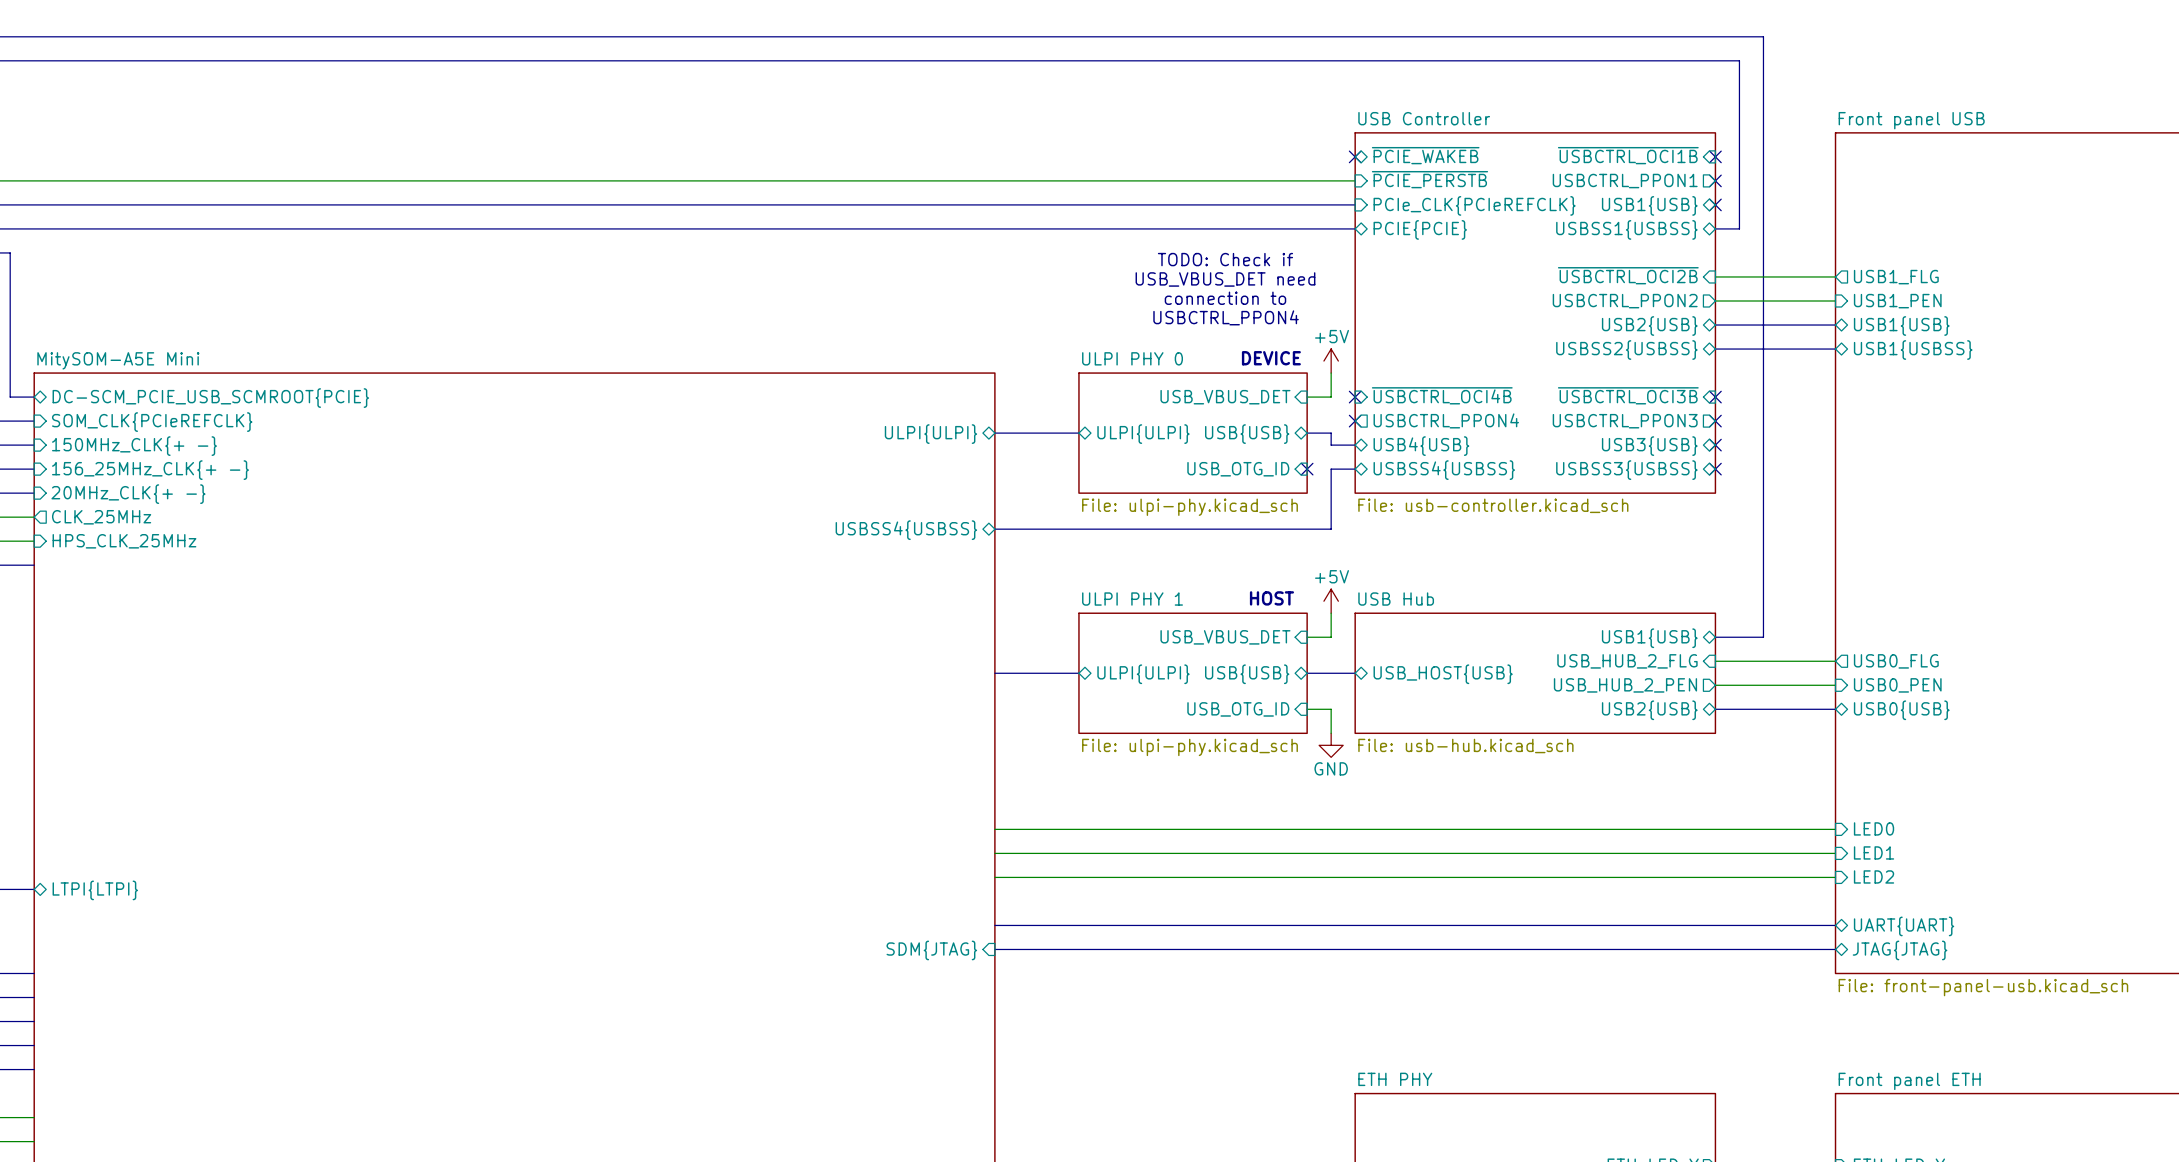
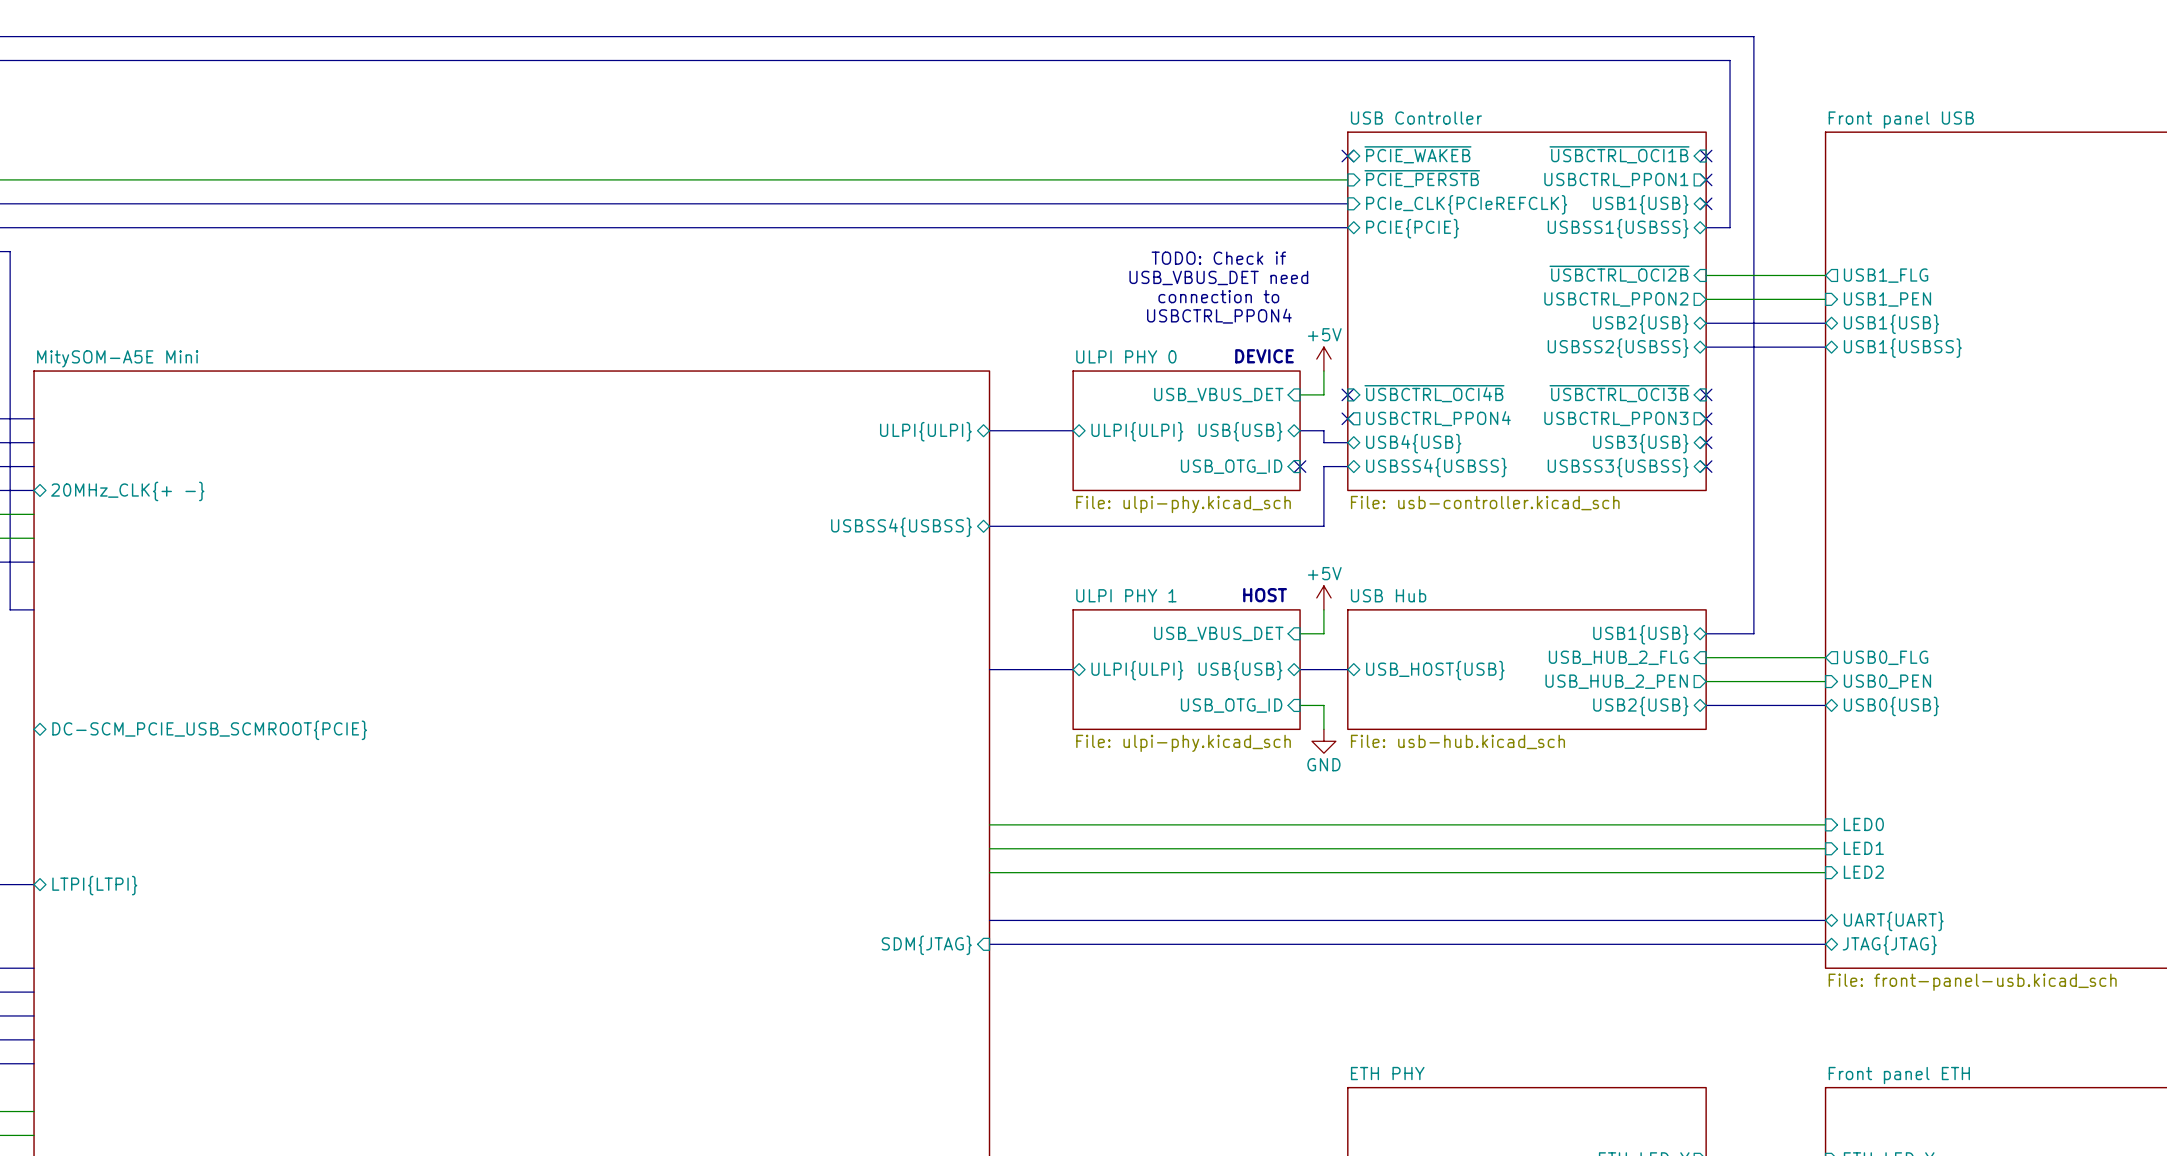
bus: (10, 397) (34, 397) -> (10, 394) (10, 609) (34, 609)
sheet pin: DC-SCM_PCIE_USB_SCMROOT{PCIE} (210, 398) -> none
sheet pin: SOM_CLK{PCIeREFCLK} (152, 422) -> none
sheet pin: 150MHz_CLK{+ -} (134, 446) -> none
sheet pin: 156_25MHz_CLK{+ -} (150, 470) -> none
sheet pin shape: input (128, 494) -> bidirectional (127, 491)
sheet pin: CLK_25MHz (101, 517) -> none
sheet pin: HPS_CLK_25MHz (124, 541) -> none
sheet pin: none -> DC-SCM_PCIE_USB_SCMROOT{PCIE} (209, 730)

